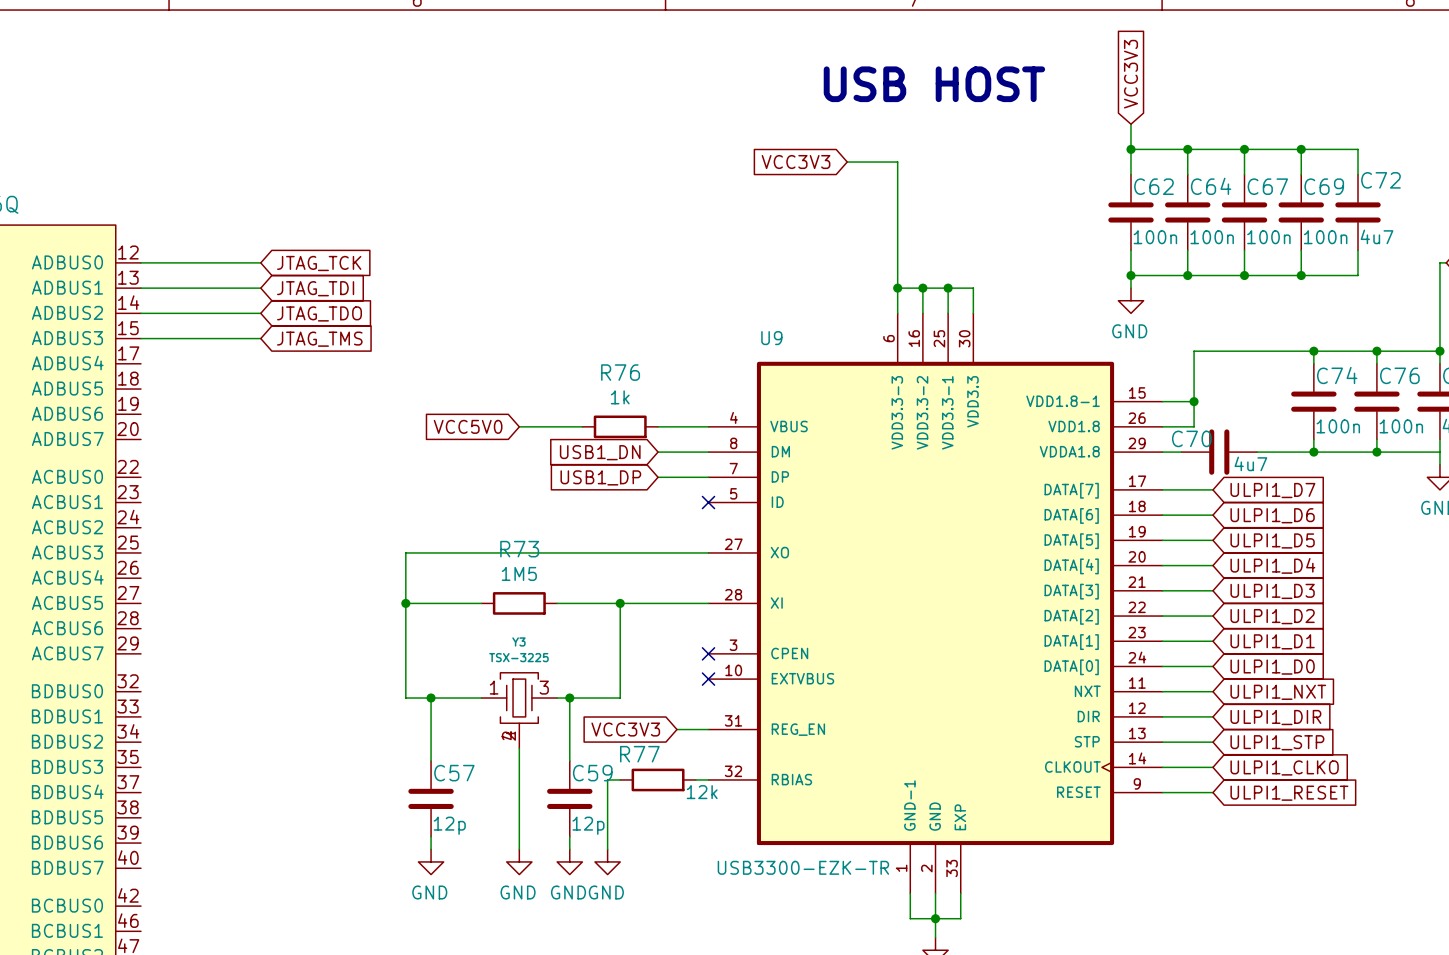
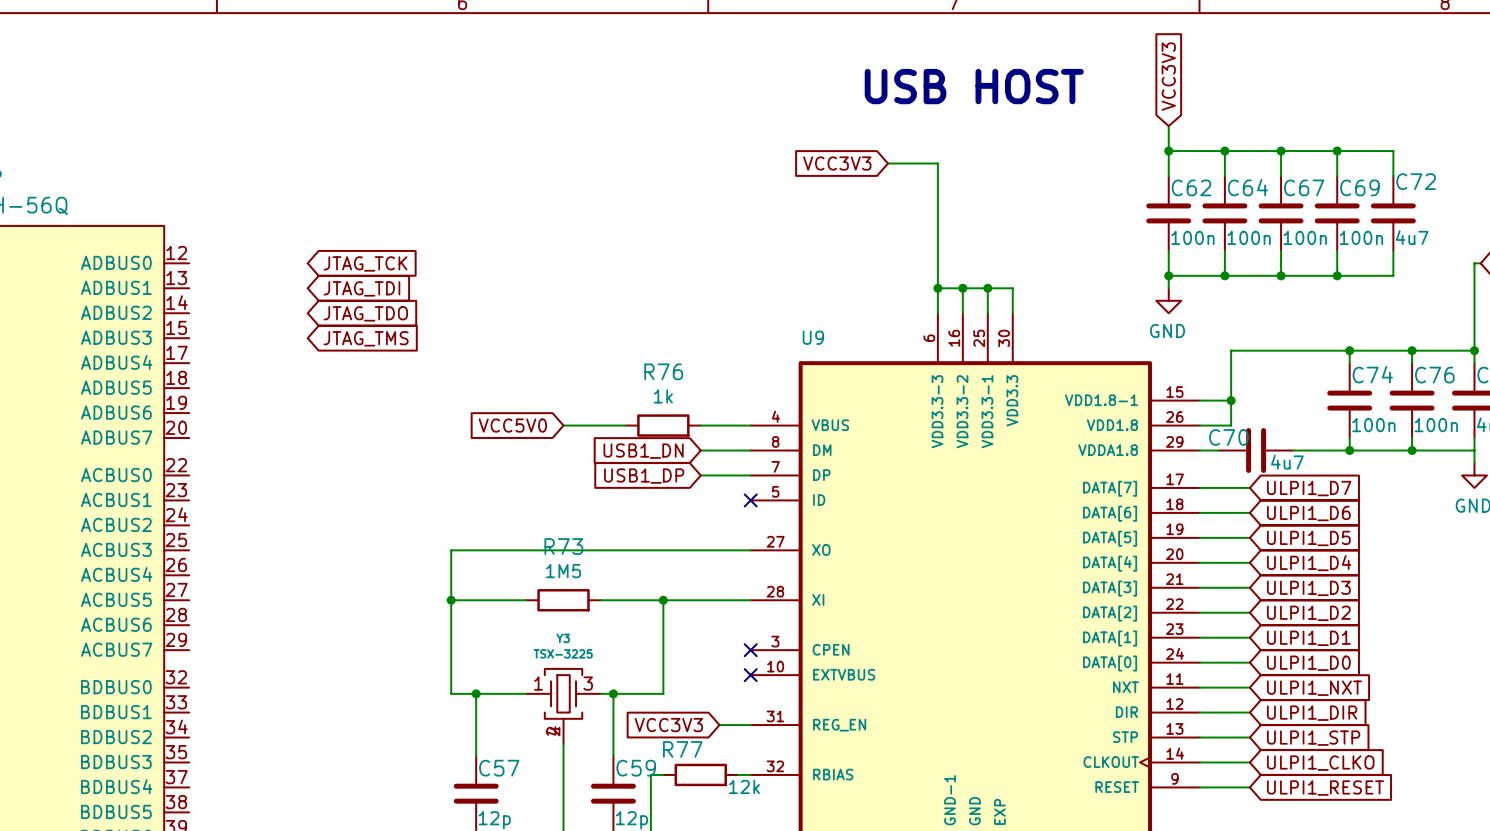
wire: (140, 262) (260, 262) -> none
wire: (140, 288) (260, 288) -> none
wire: (140, 313) (260, 313) -> none
wire: (140, 338) (260, 338) -> none

